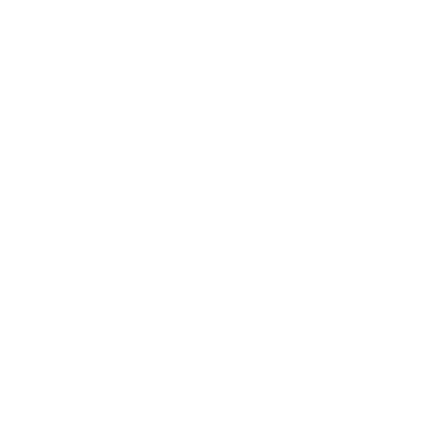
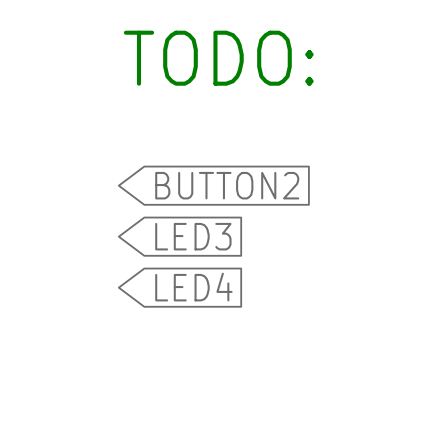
text: none -> TODO: (218, 58)
global label: none -> BUTTON2 (227, 185)
global label: none -> LED3 (193, 236)
global label: none -> LED4 (193, 287)

